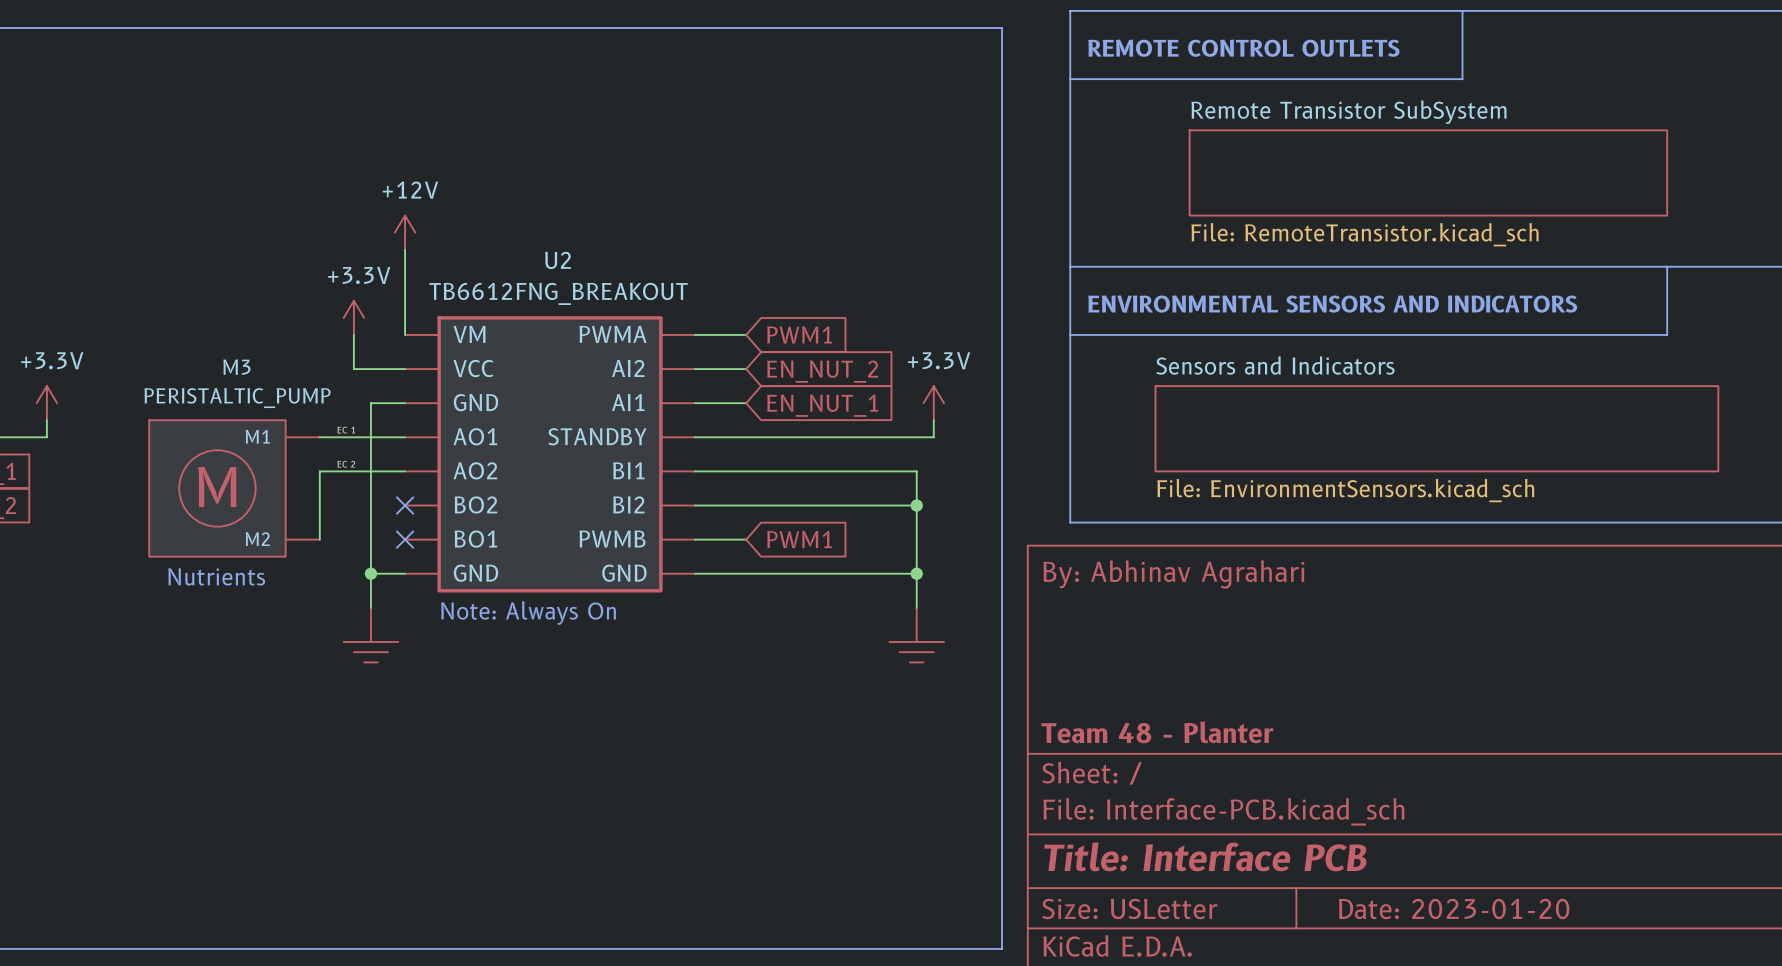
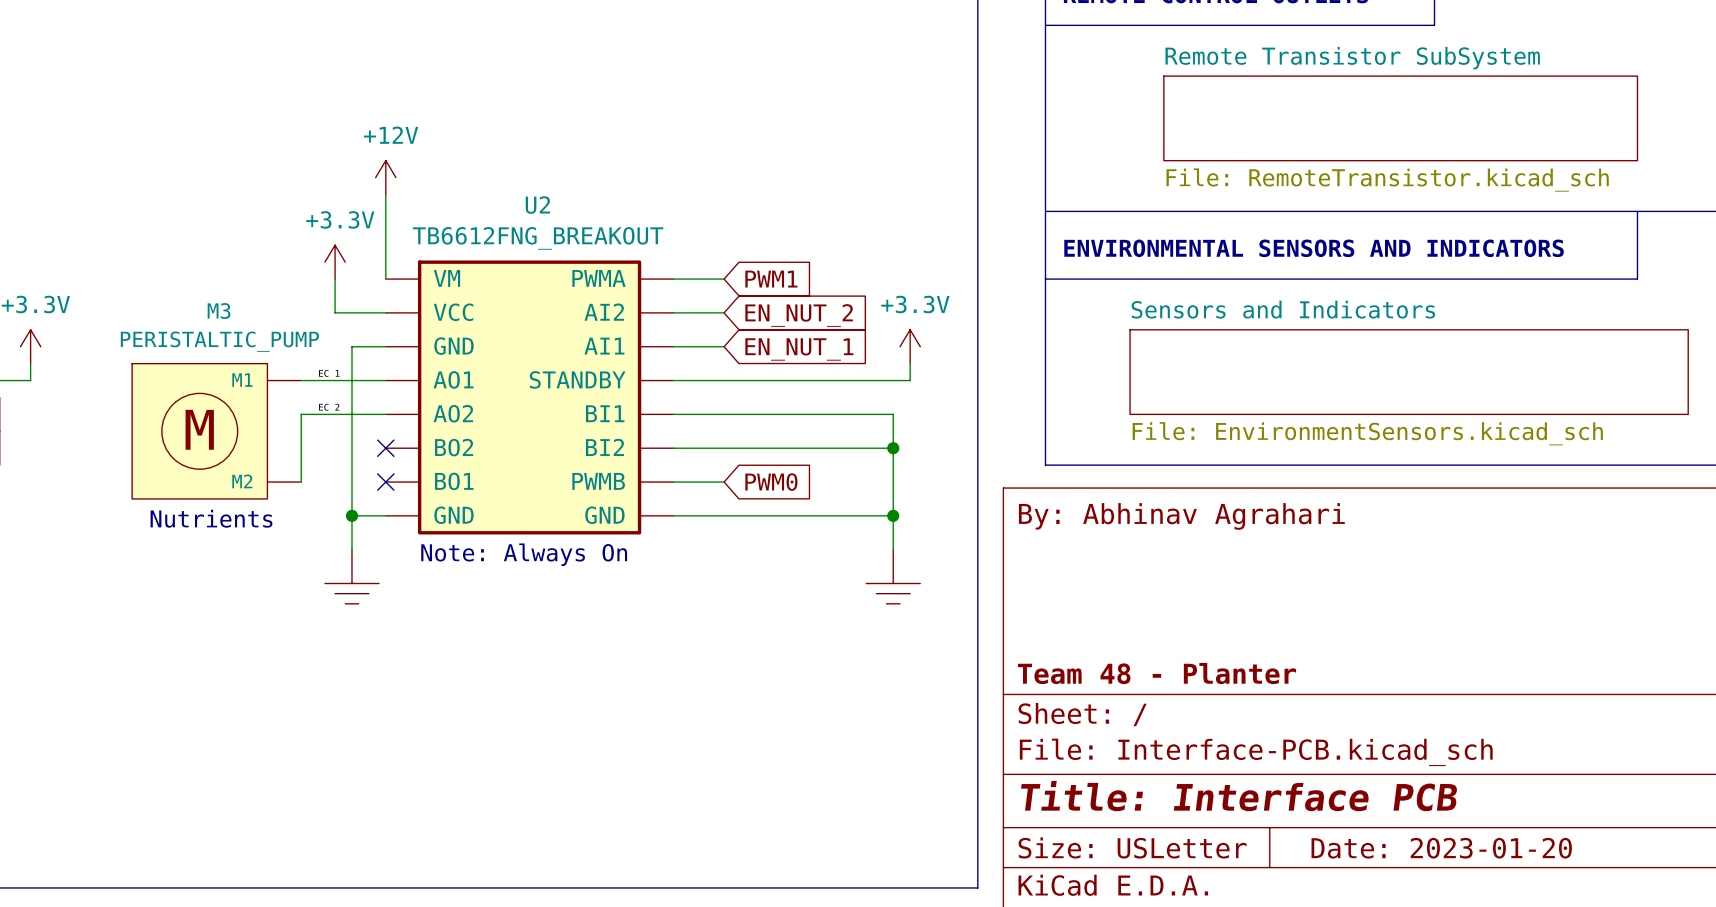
global label: PWM1 (799, 539) -> PWM0 (771, 482)

